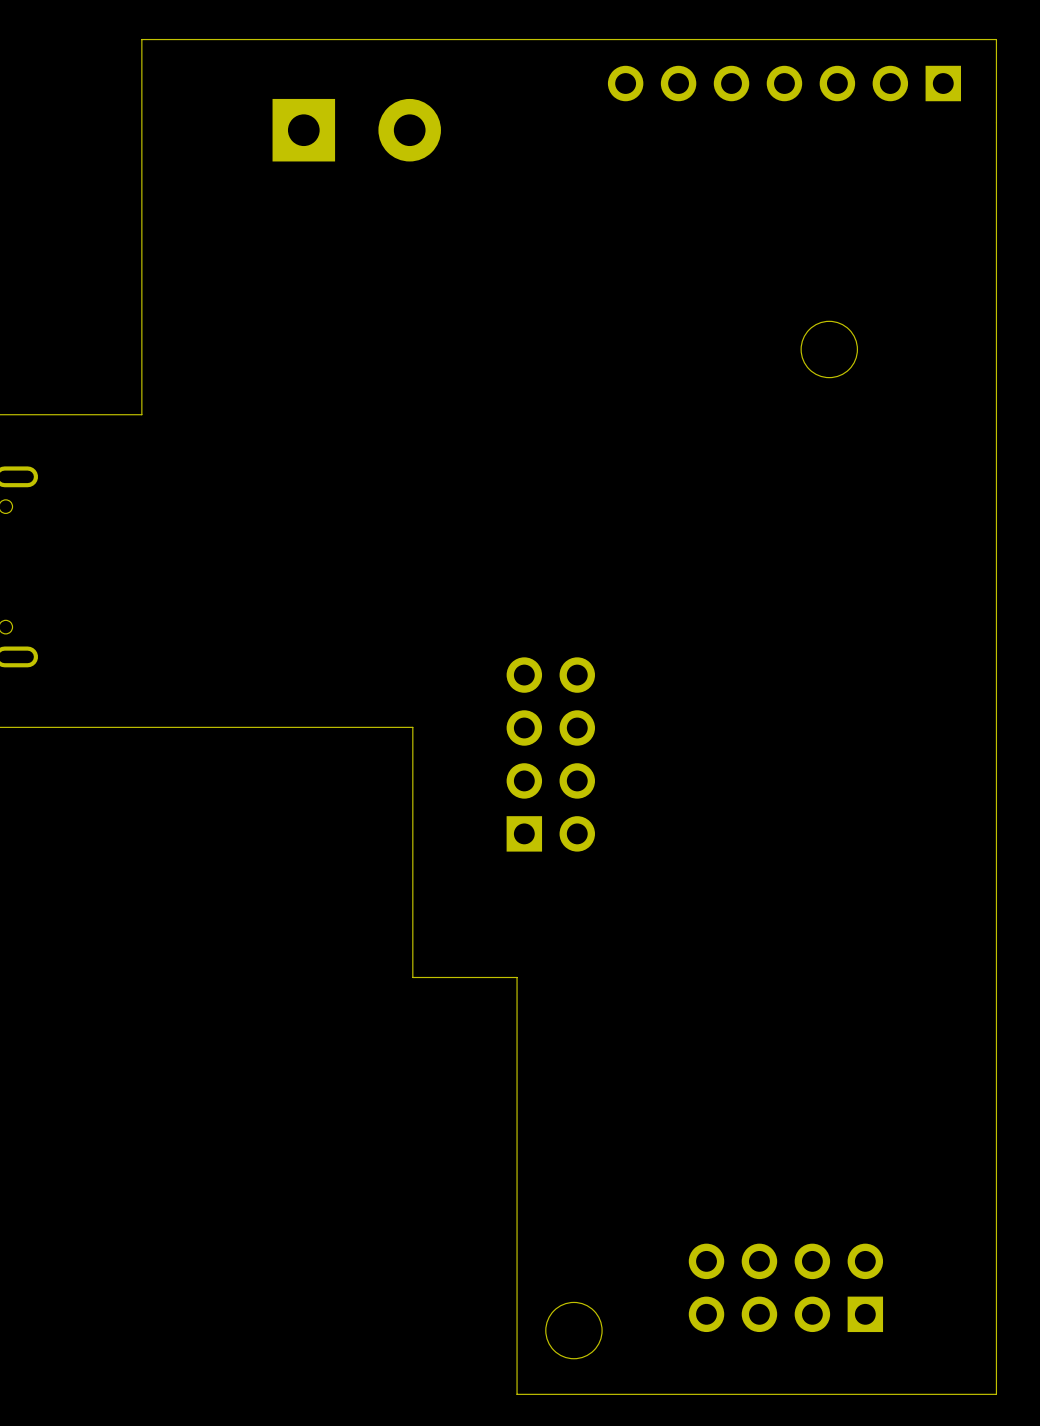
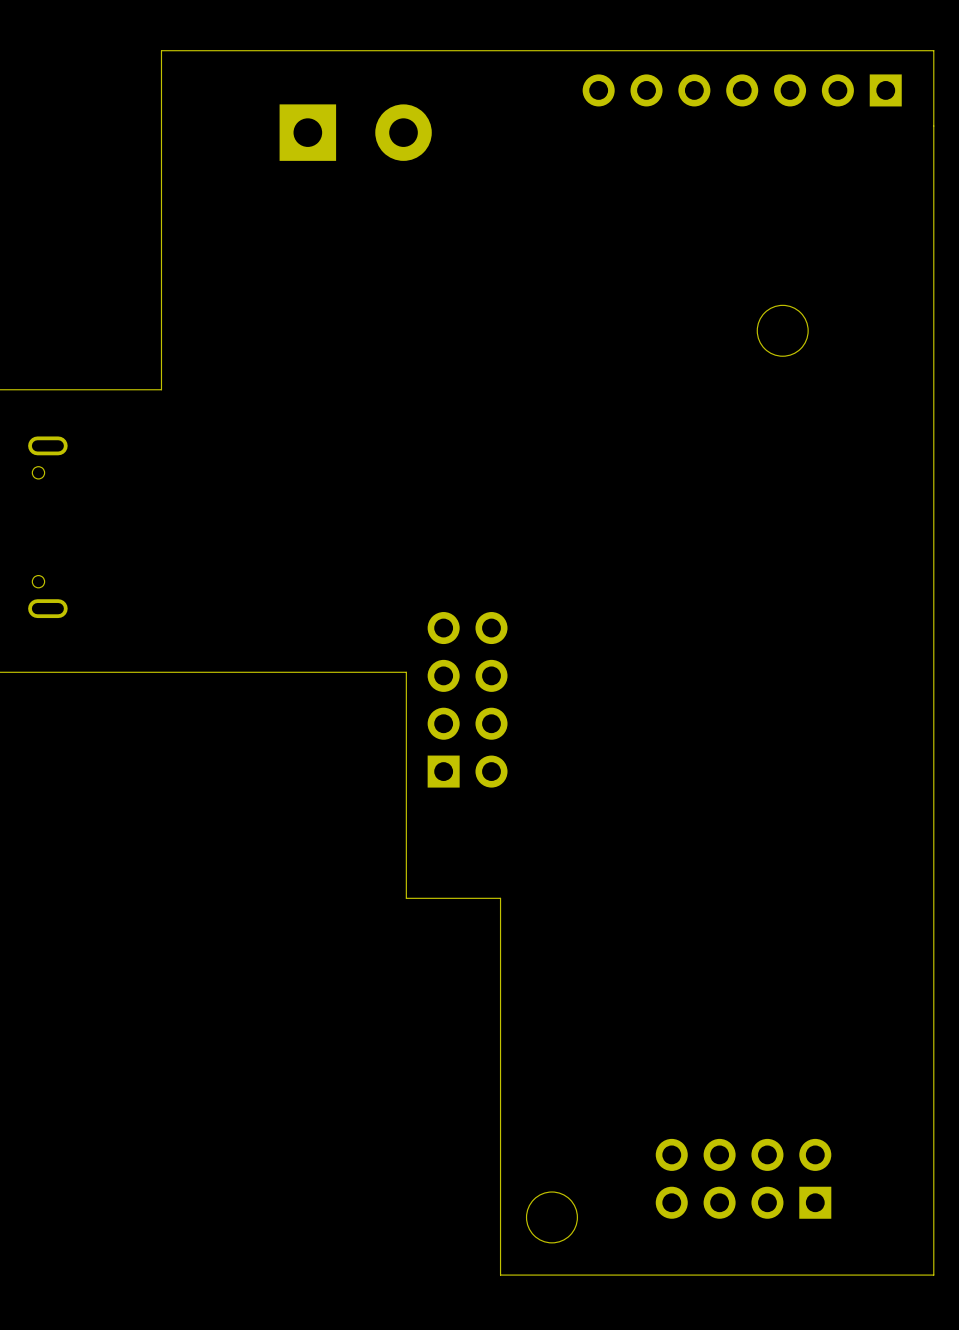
part position: (550, 754) -> (467, 699)

